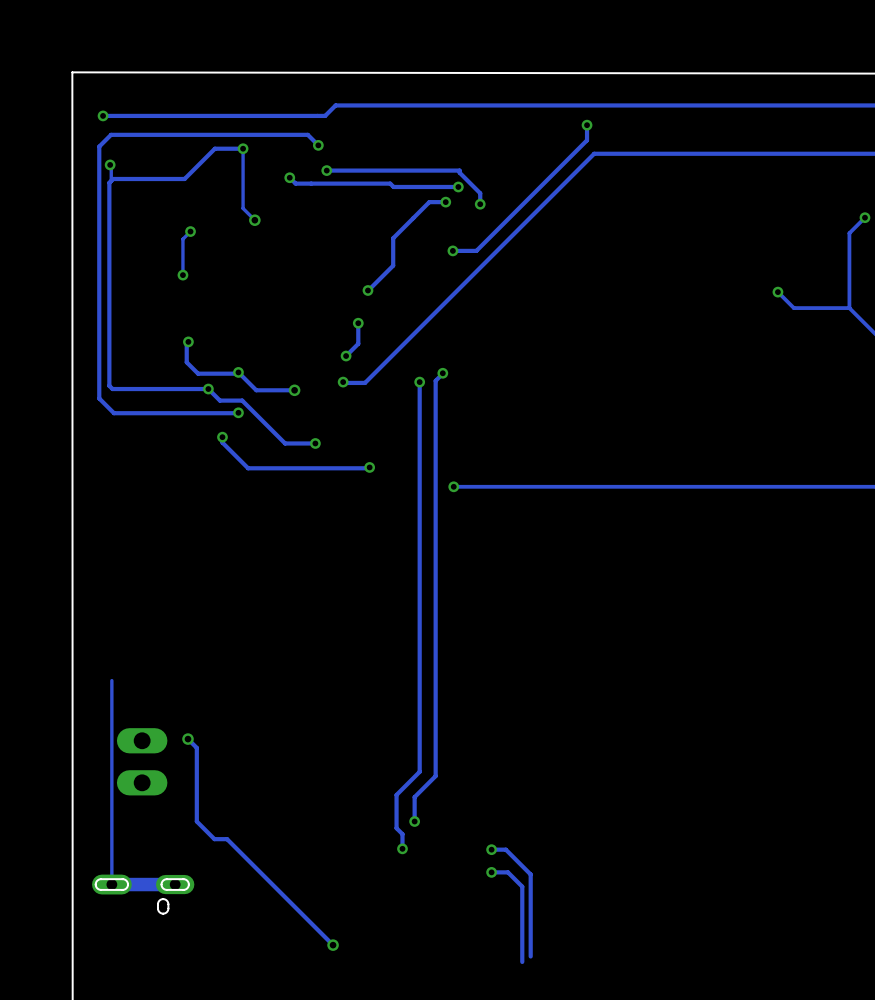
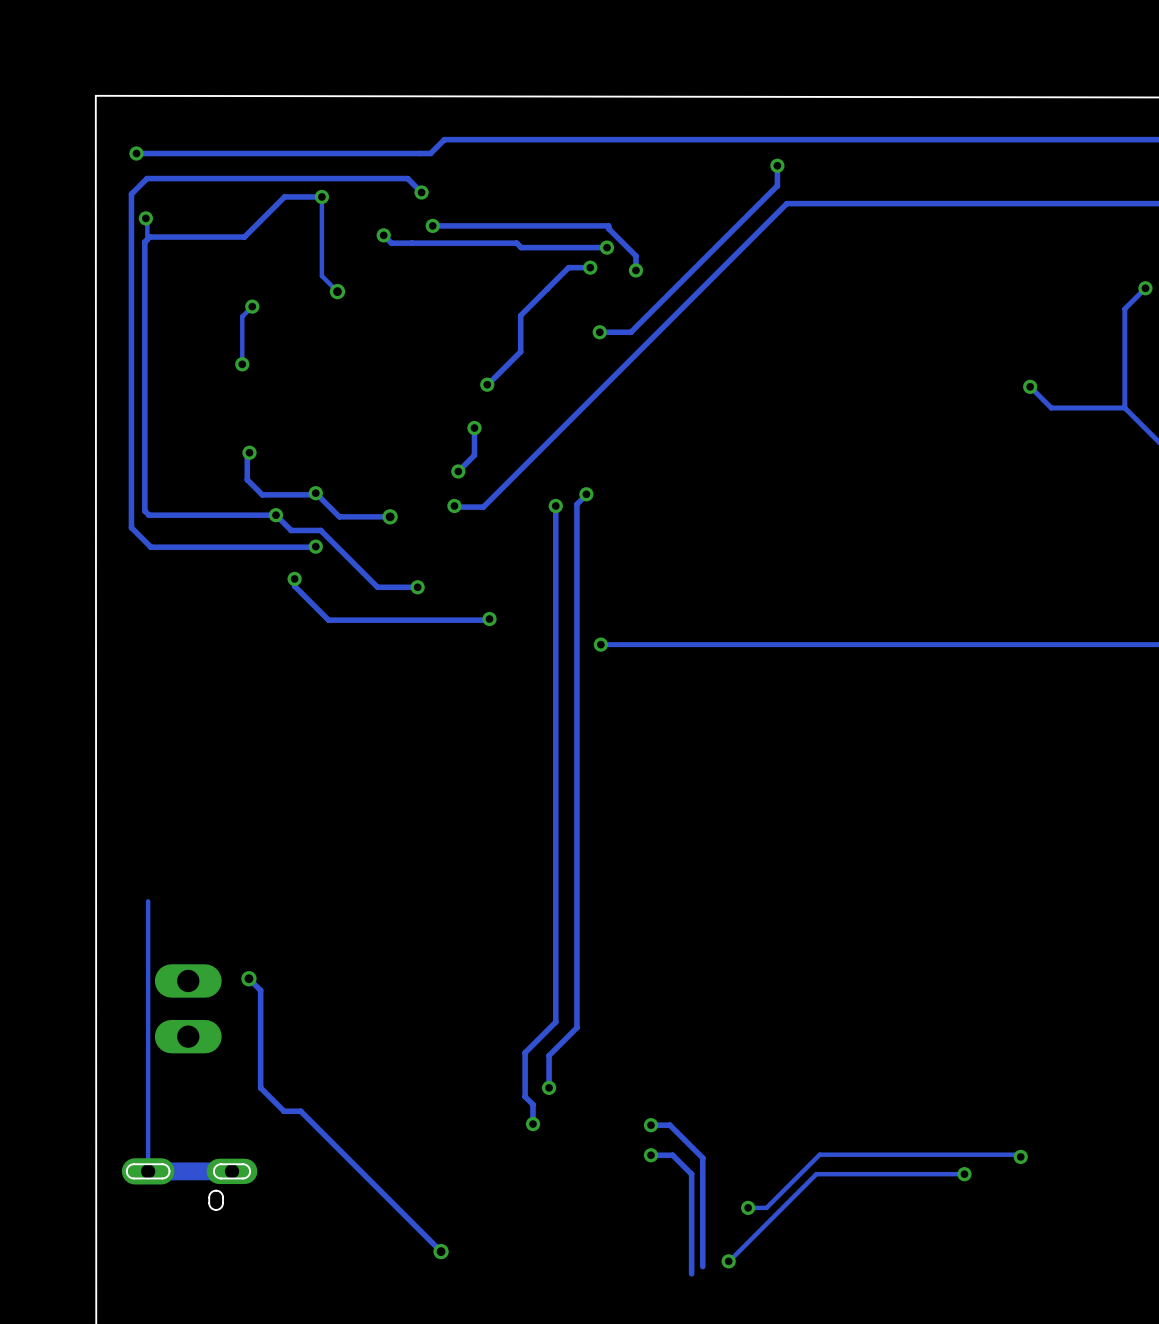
track: none -> (1020, 1156) (1018, 1154) (819, 1154) (766, 1207) (748, 1207)
via: none -> (1020, 1156)
track: none -> (964, 1174) (816, 1174) (728, 1261)
via: none -> (964, 1174)
via: none -> (748, 1207)
via: none -> (728, 1261)

